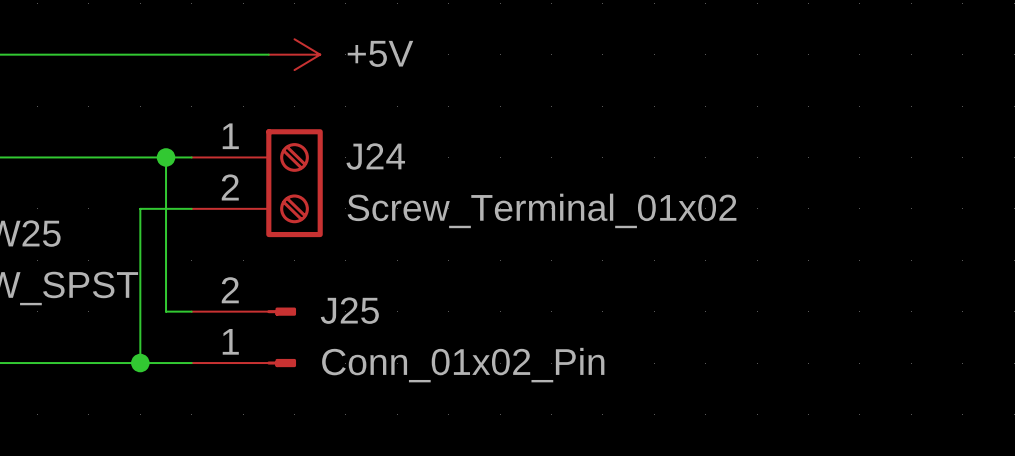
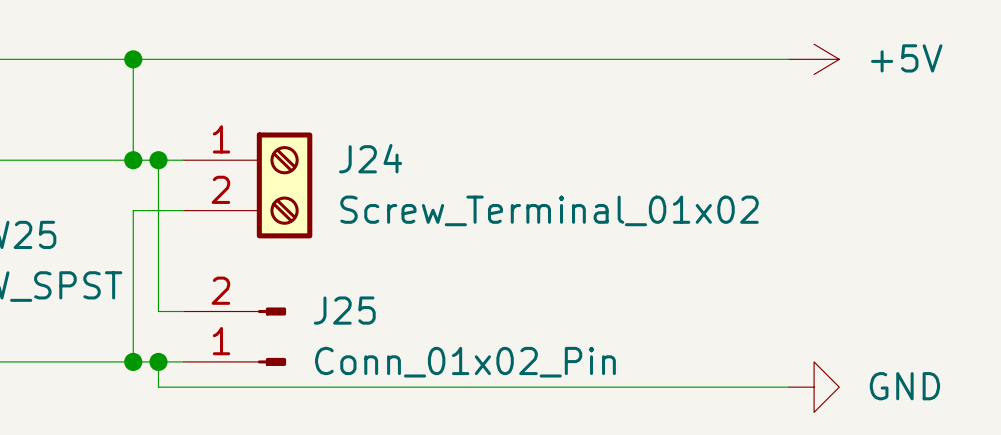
wire: none -> (133, 59) (133, 160)
junction: none -> (133, 59)
wire: none -> (259, 59) (788, 59)
power symbol: +5V (294, 54) -> none
power symbol: none -> +5V (814, 59)
junction: none -> (133, 160)
wire: none -> (158, 361) (158, 387) (788, 387)
junction: none -> (158, 361)
power symbol: none -> GND (814, 387)

